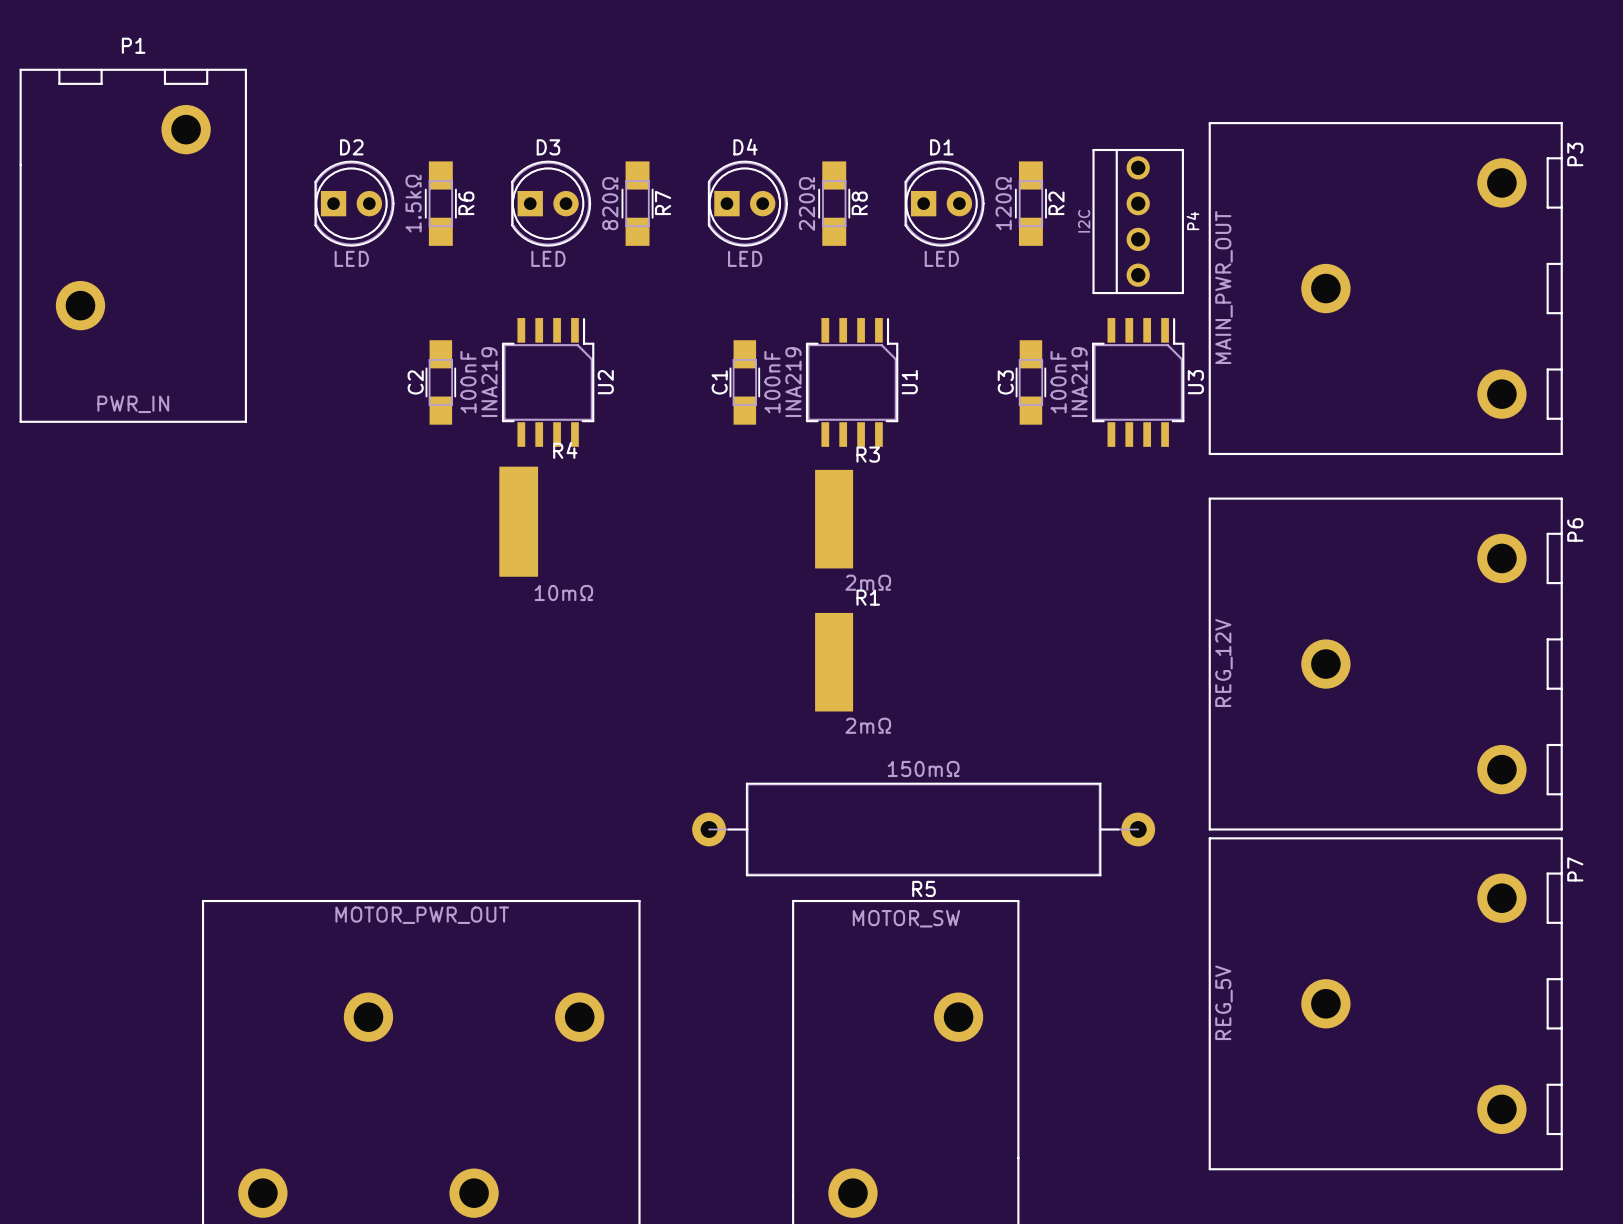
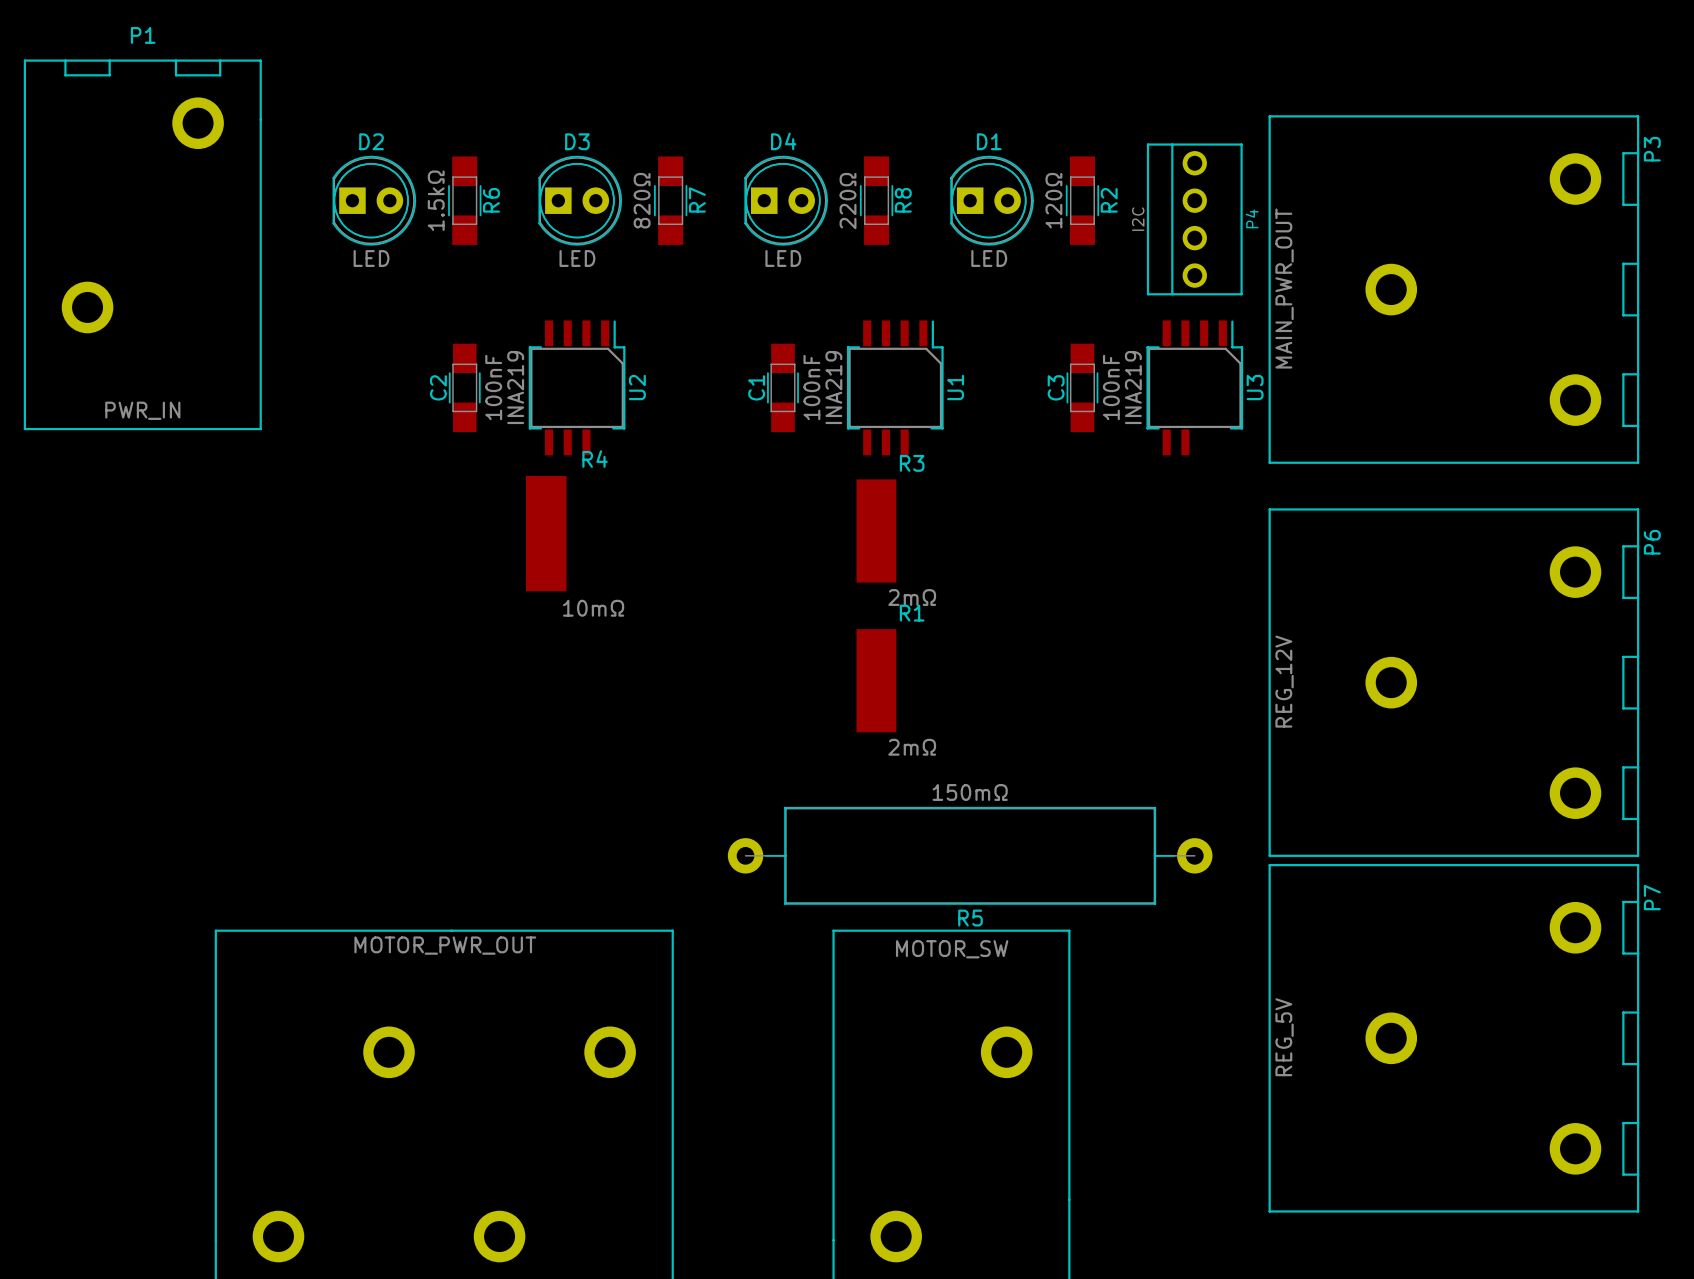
U2 footprint: [501, 318, 595, 447] -> [528, 320, 626, 456]
U1 footprint: [805, 318, 899, 447] -> [846, 320, 944, 456]
U3 footprint: [1092, 318, 1185, 447] -> [1146, 320, 1244, 456]

